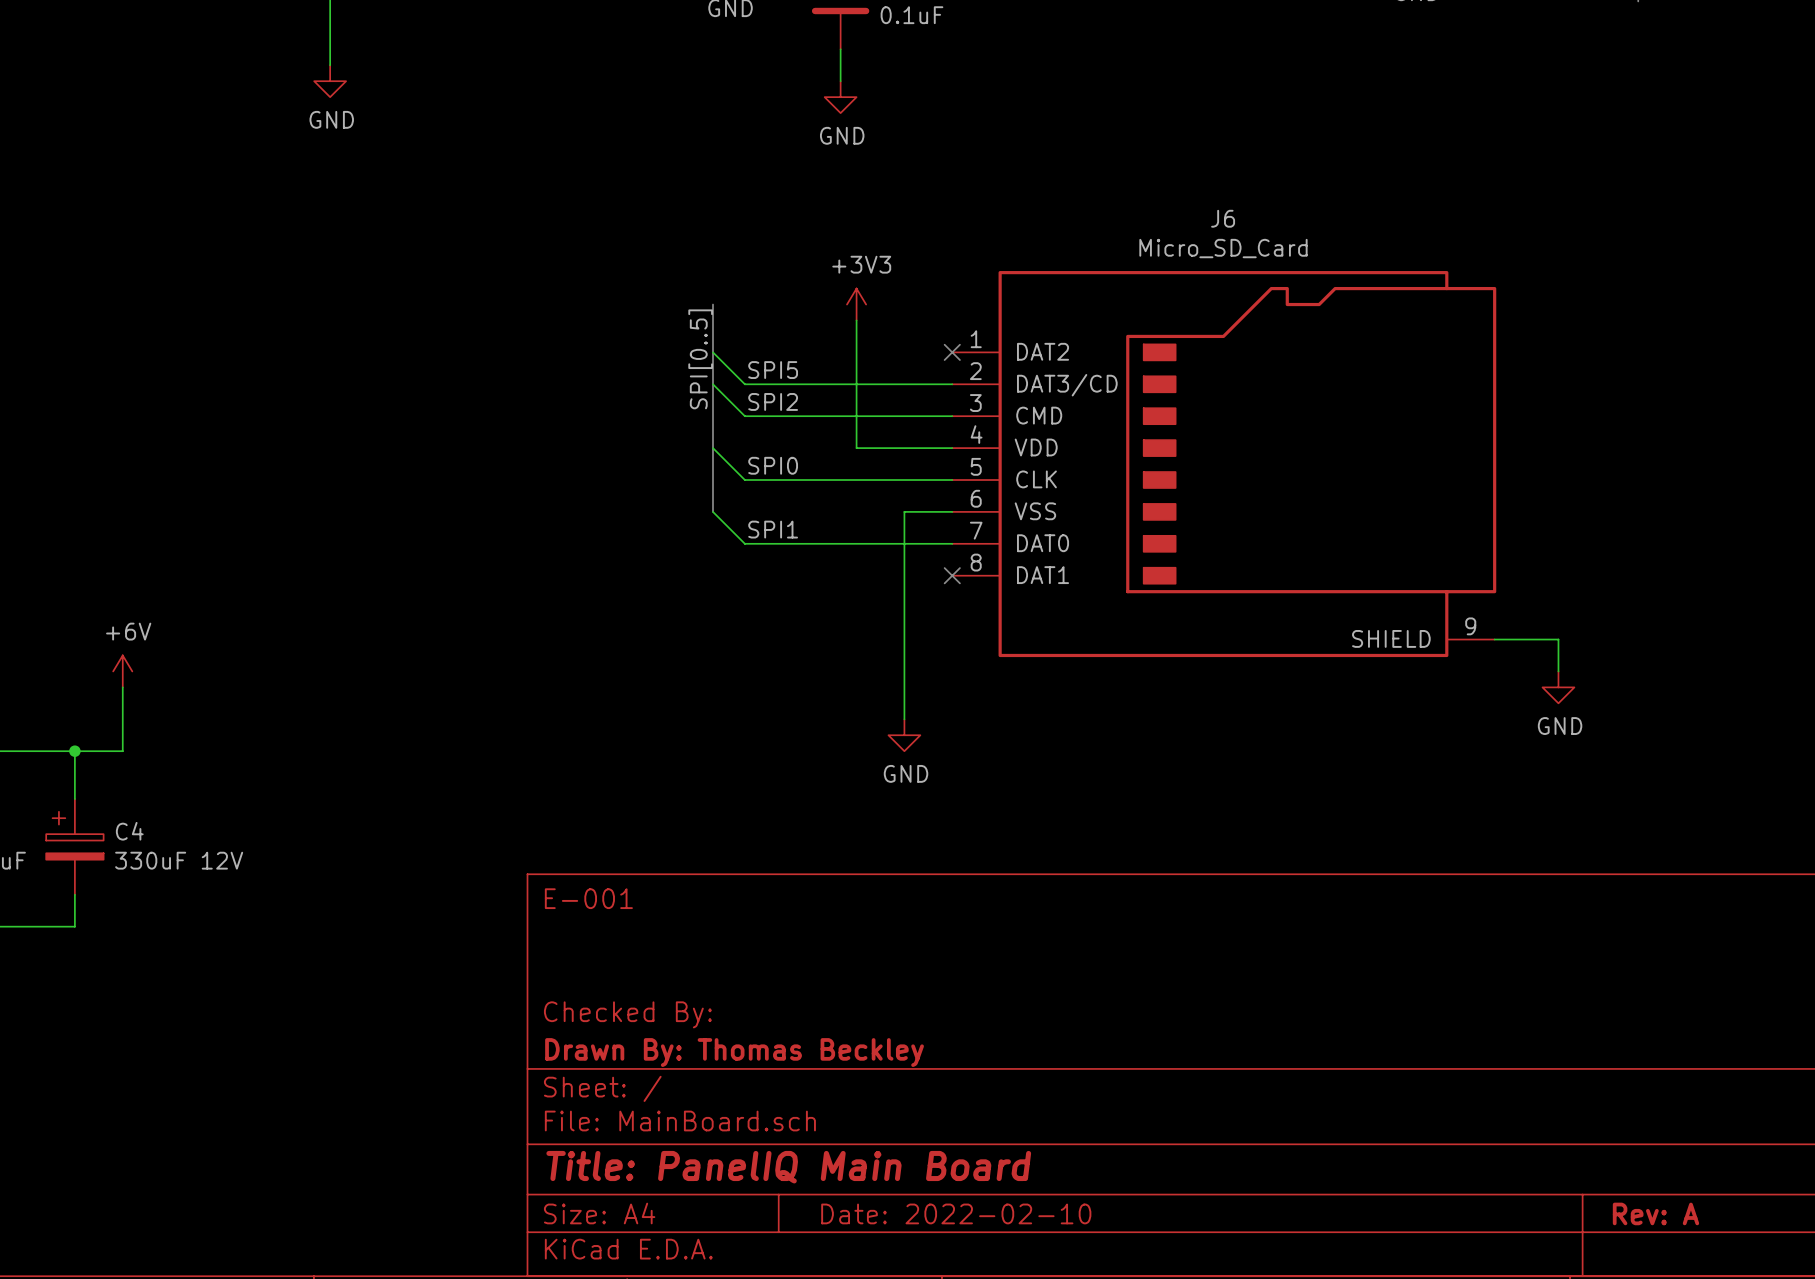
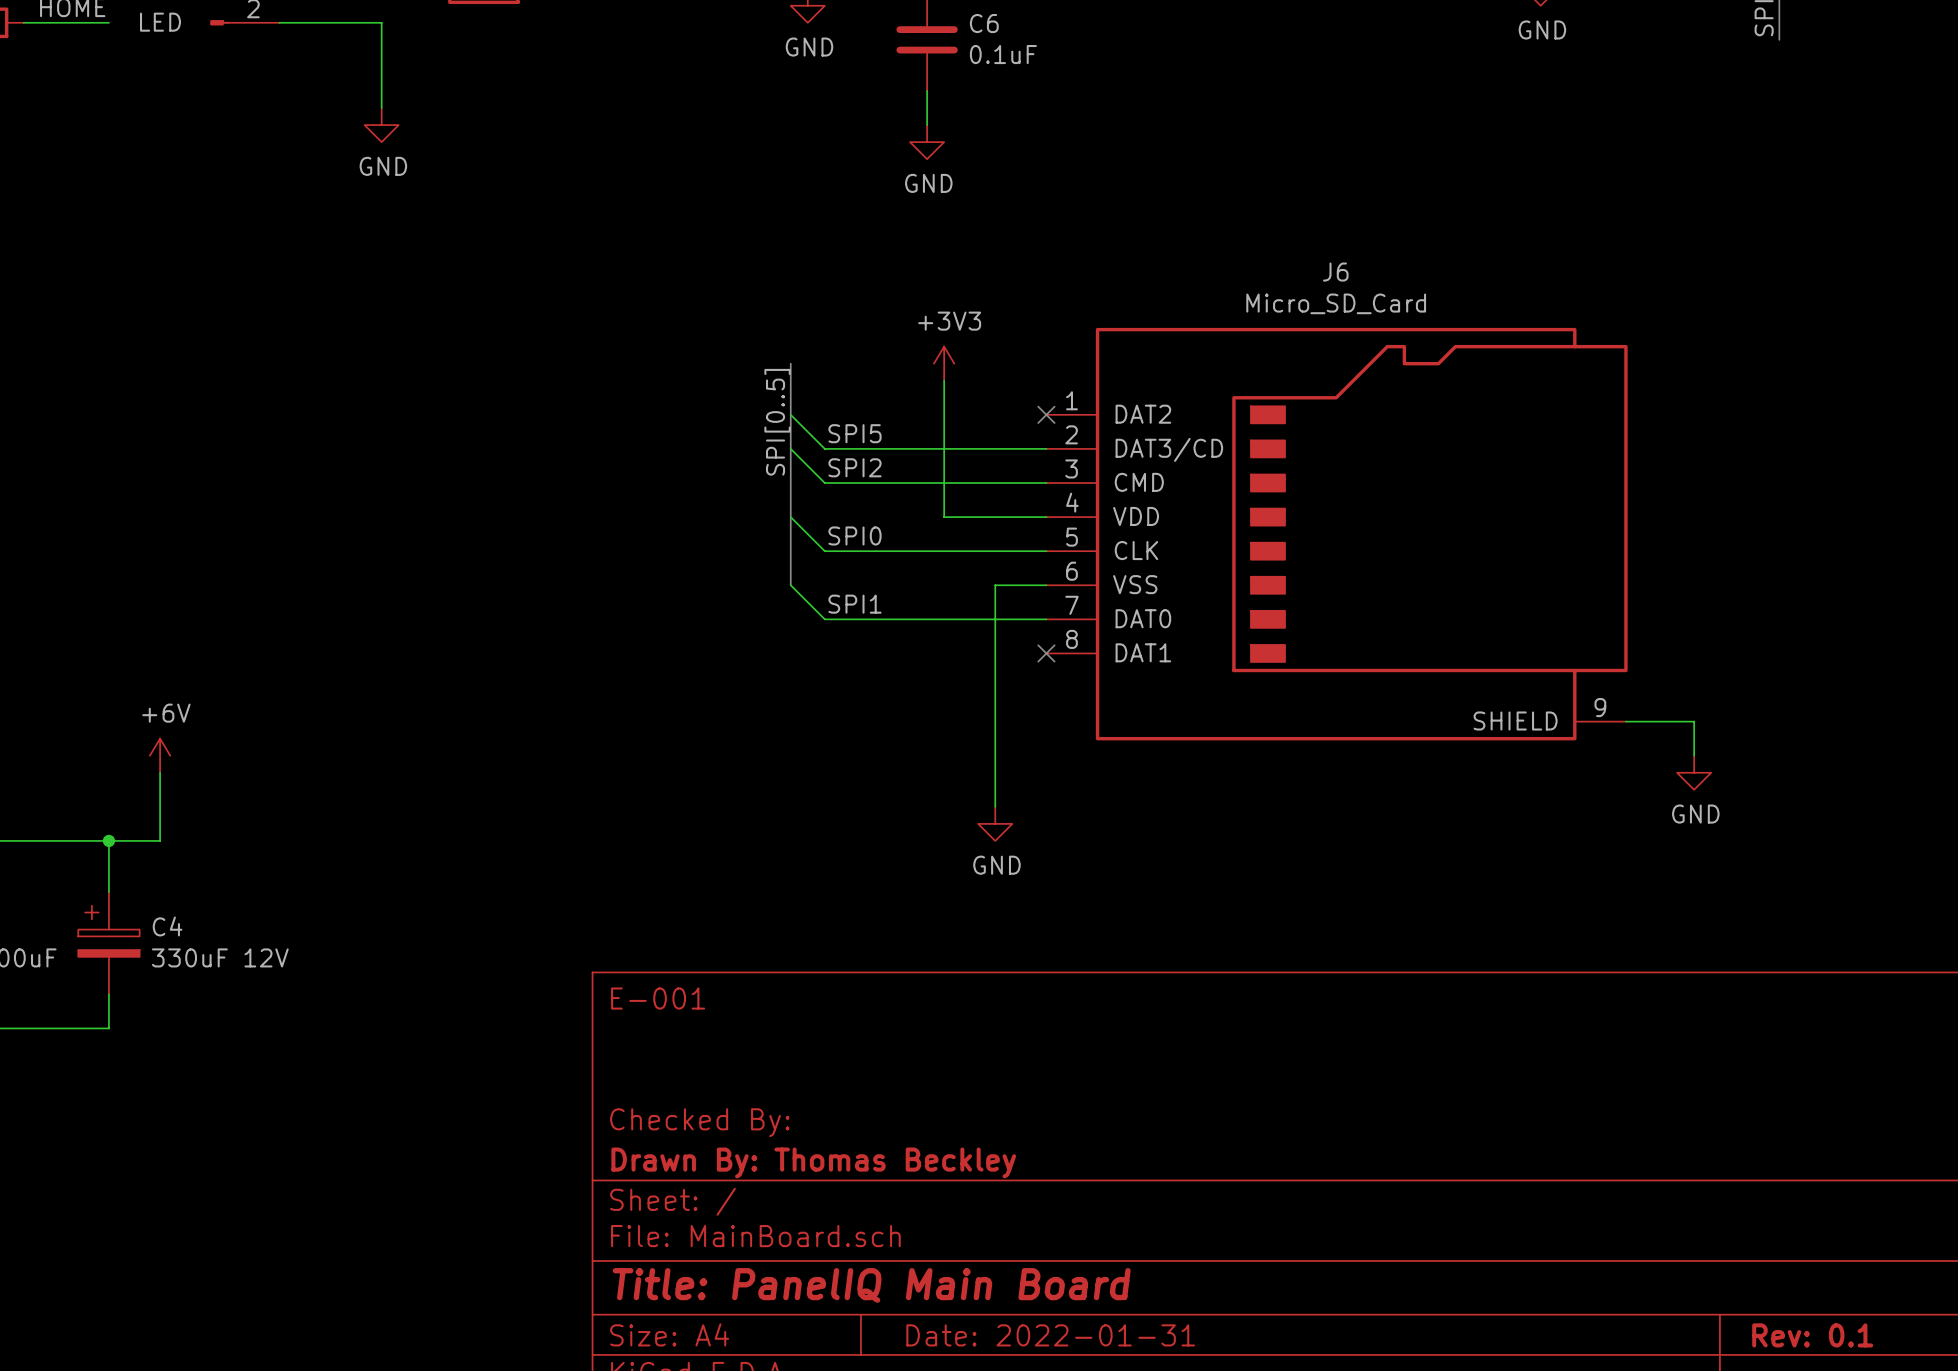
title block: Date: 2022-02-10 (956, 1213) -> Date: 2022-01-31 (1050, 1335)
title block: Rev: A (1655, 1213) -> Rev: 0.1 (1812, 1335)

